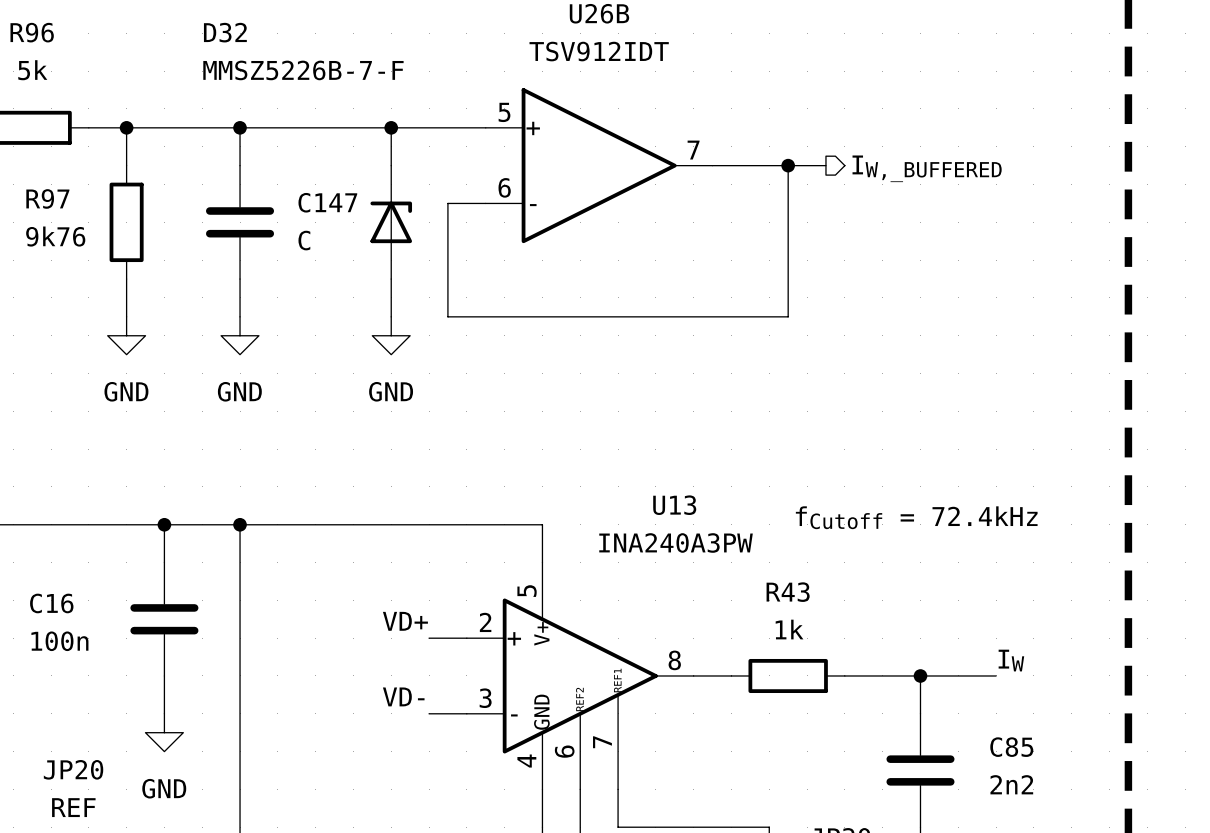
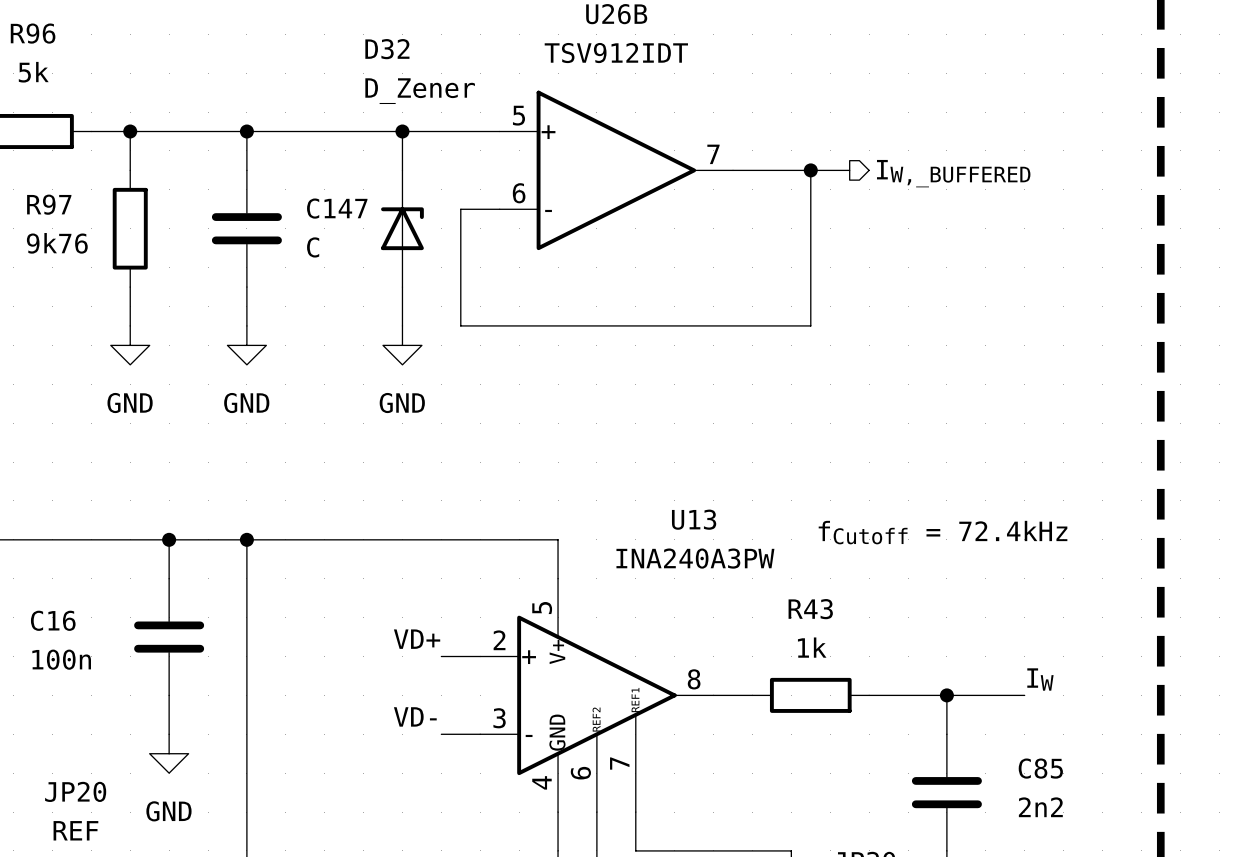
D32 name position: D32 (225, 32) -> D32 (387, 49)
D32 value: MMSZ5226B-7-F (303, 70) -> D_Zener (420, 91)

